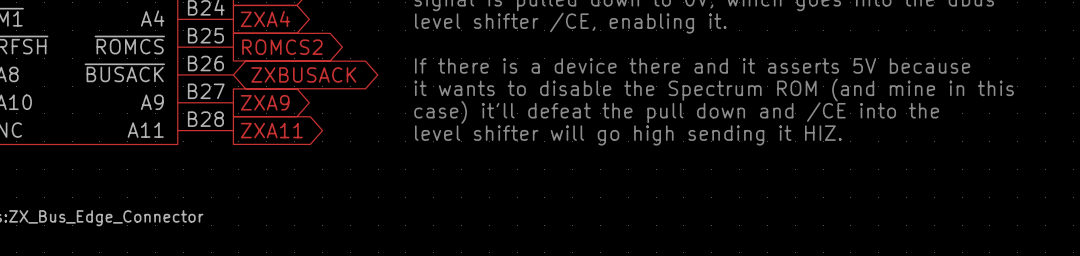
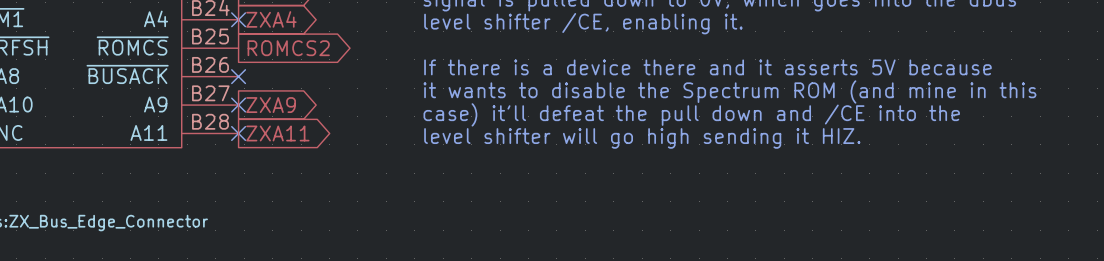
no-connect mark: none -> (238, 19)
no-connect mark: none -> (238, 76)
global label: ZXBUSACK (303, 74) -> none
no-connect mark: none -> (238, 105)
no-connect mark: none -> (238, 133)

